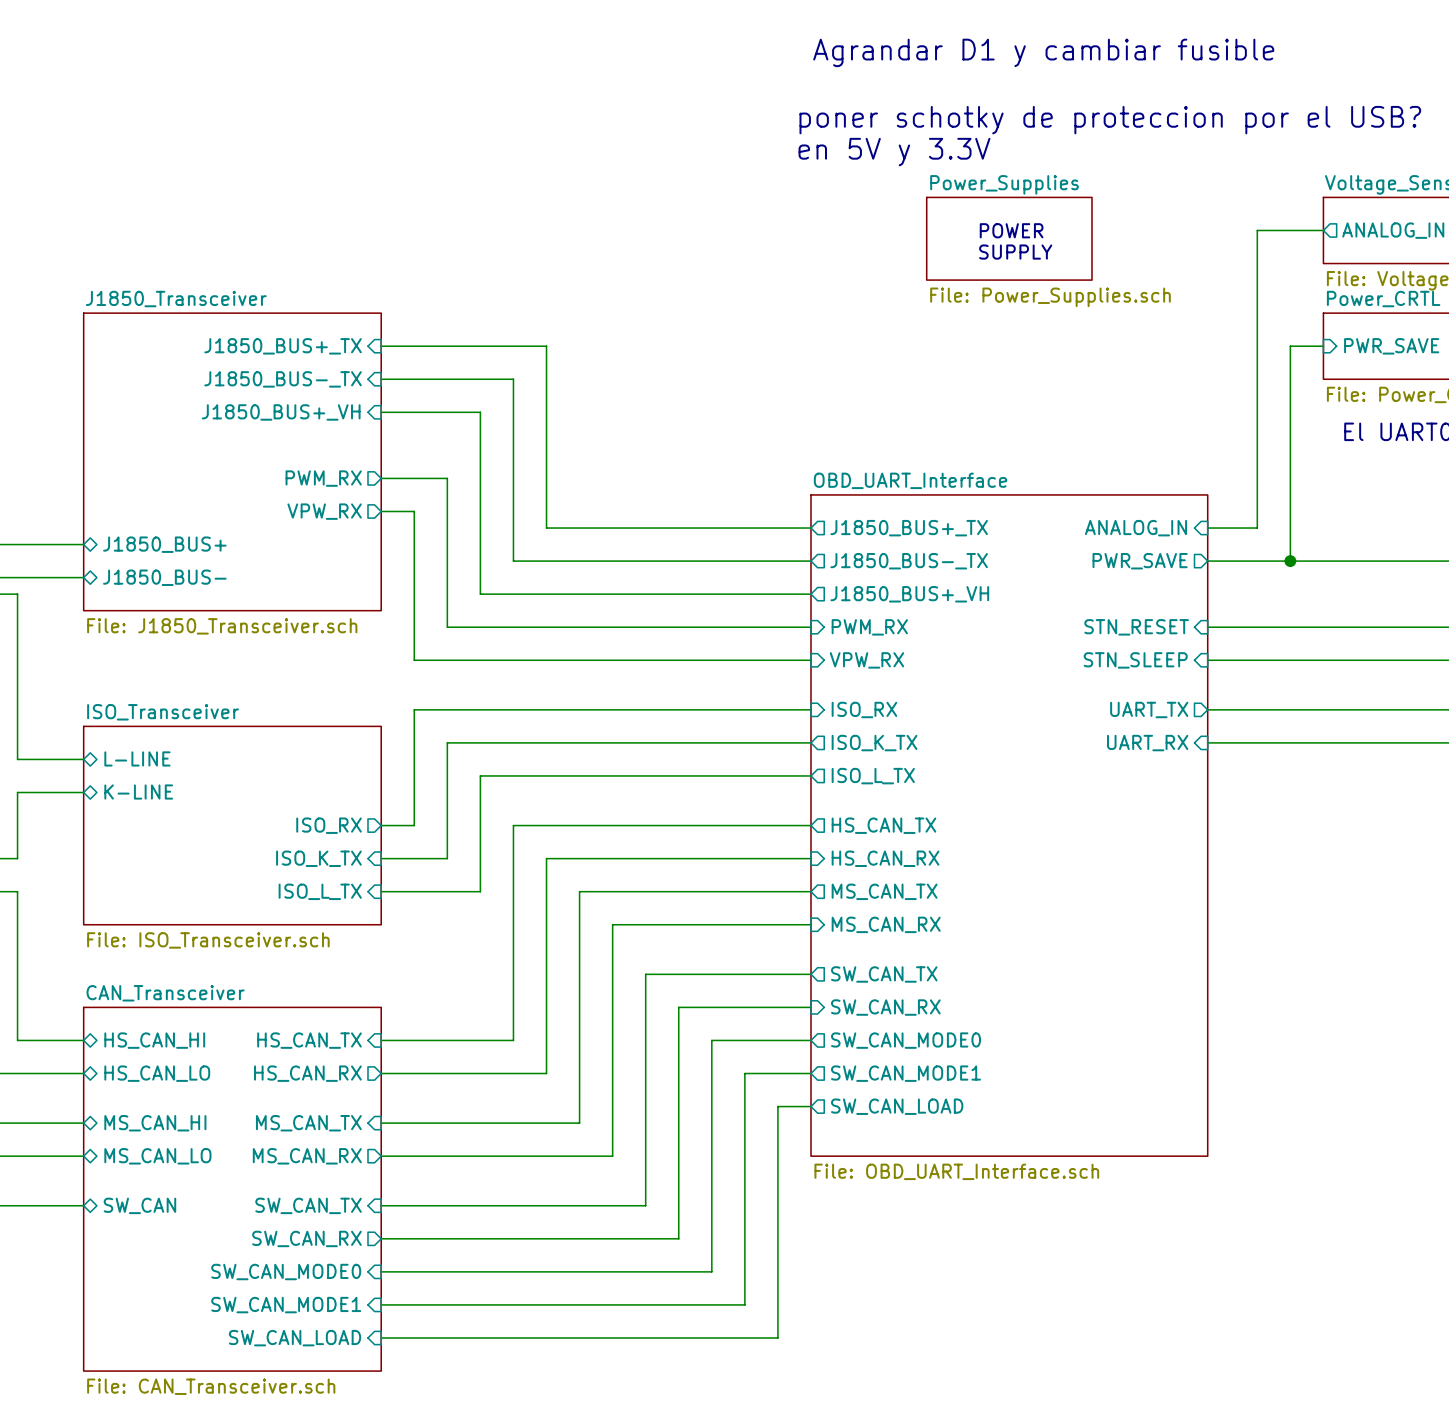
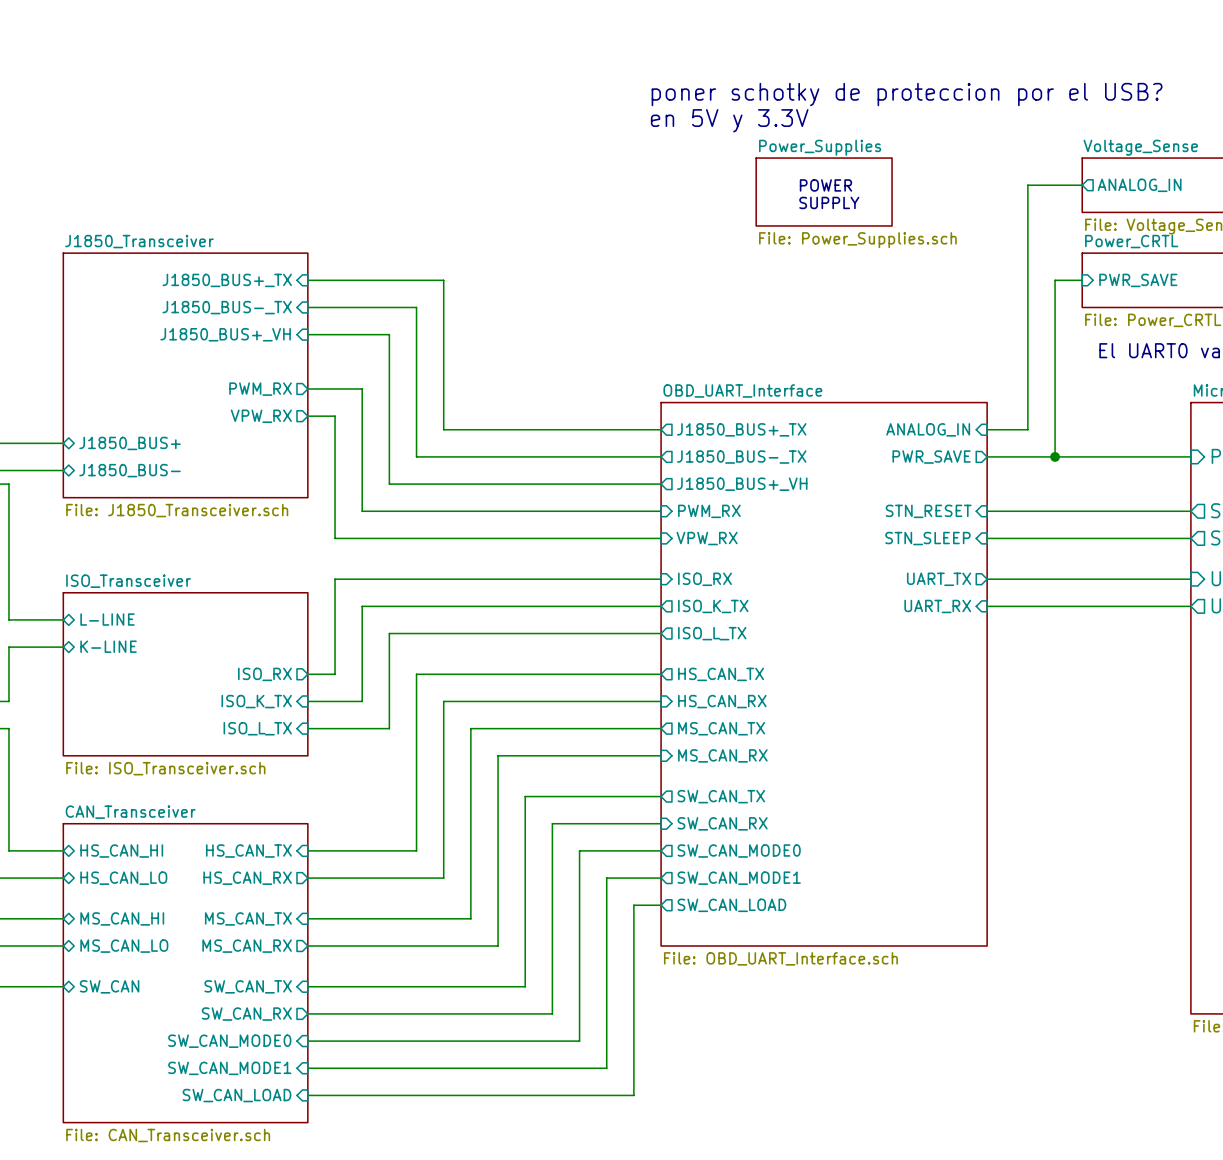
text: Agrandar D1 y cambiar fusible (1043, 52) -> none

